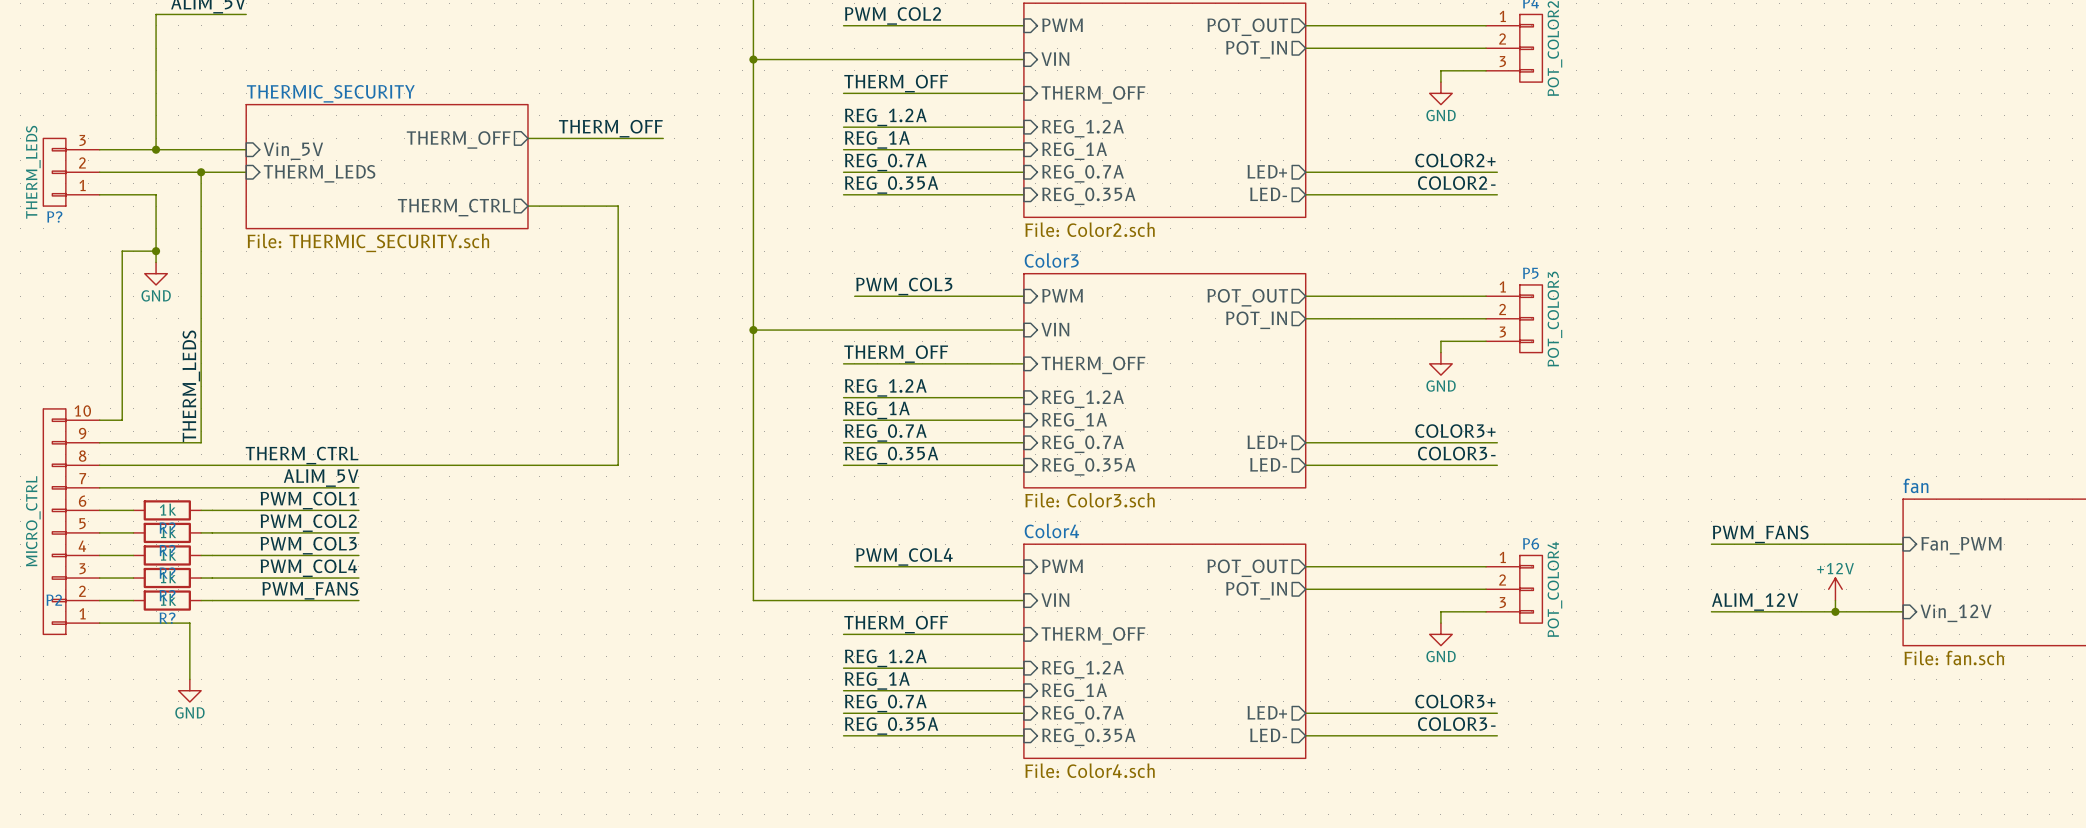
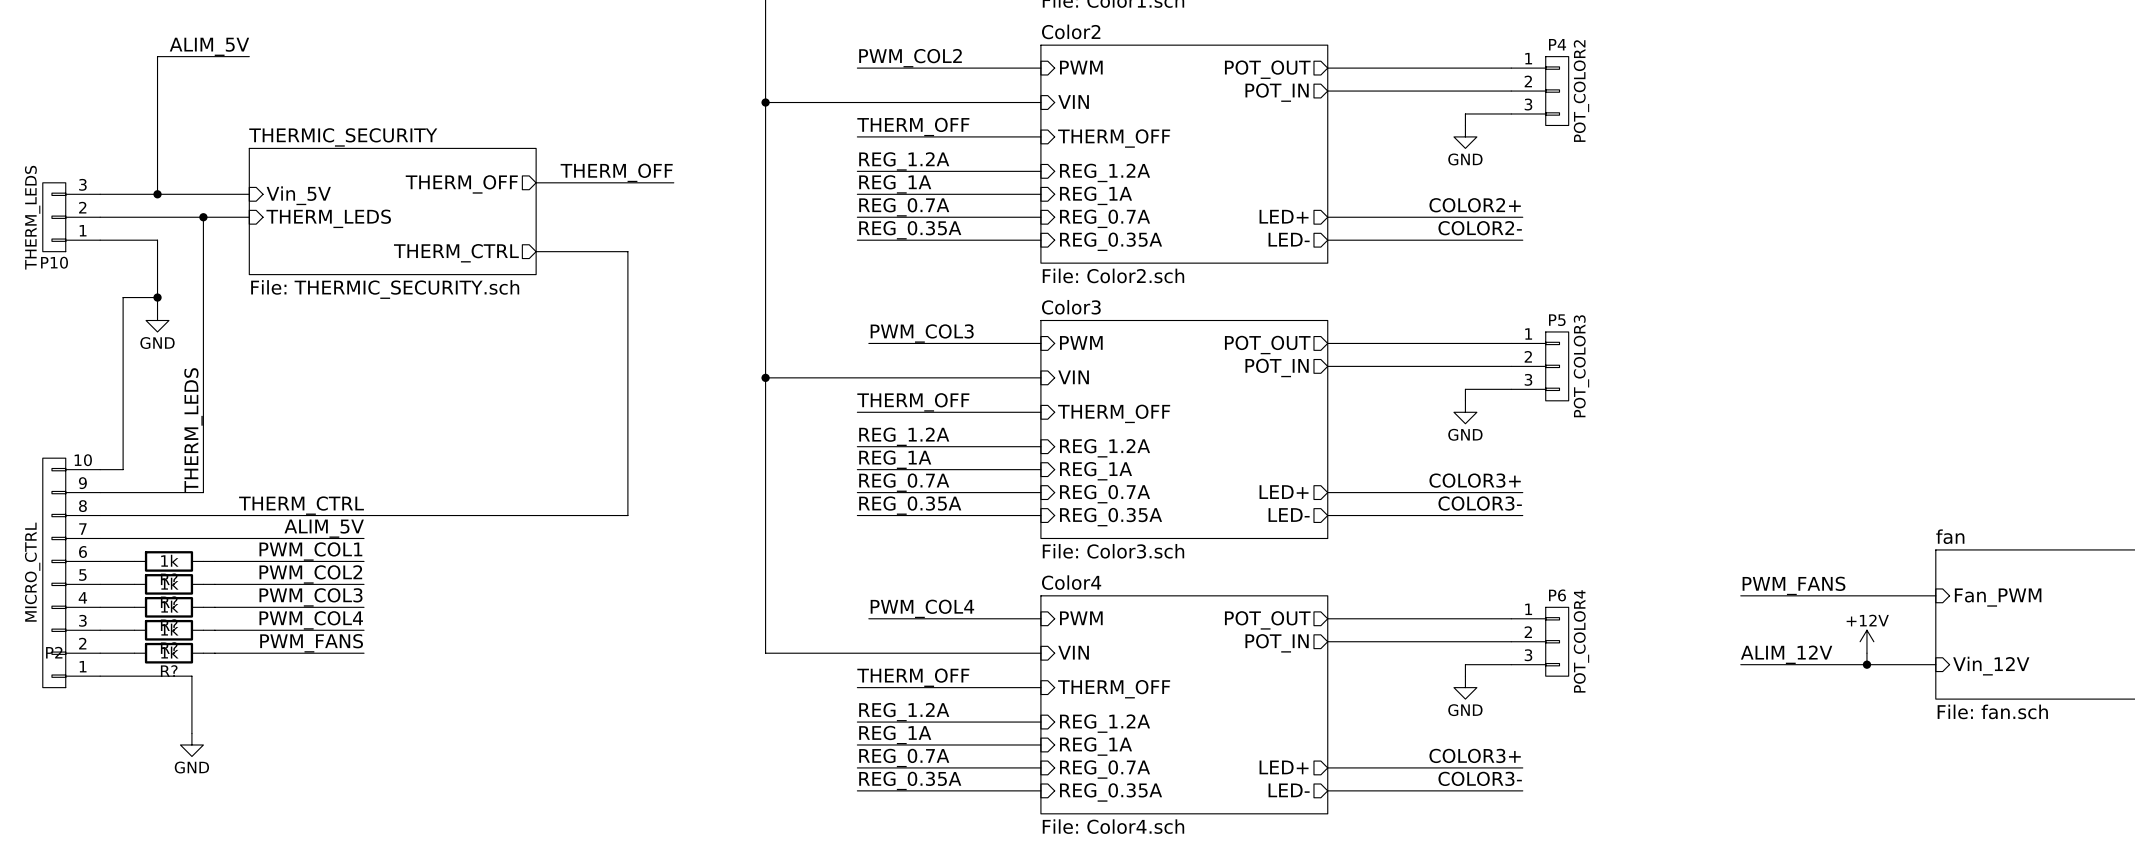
P? name: P? (54, 216) -> P10 (54, 262)

